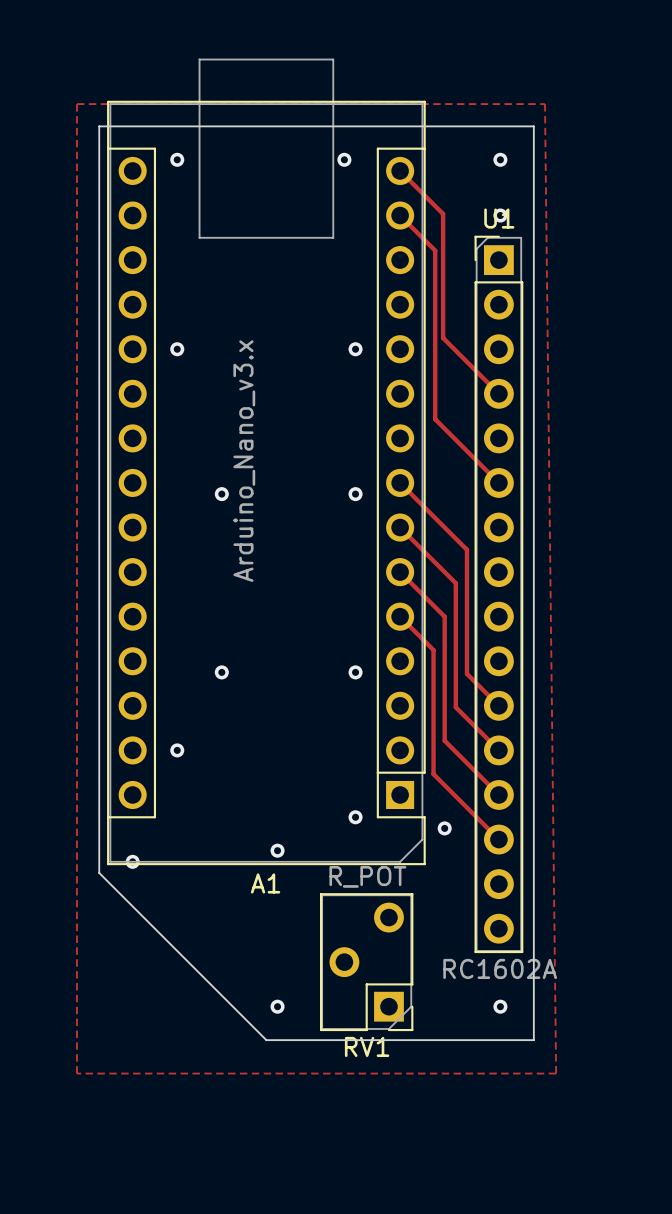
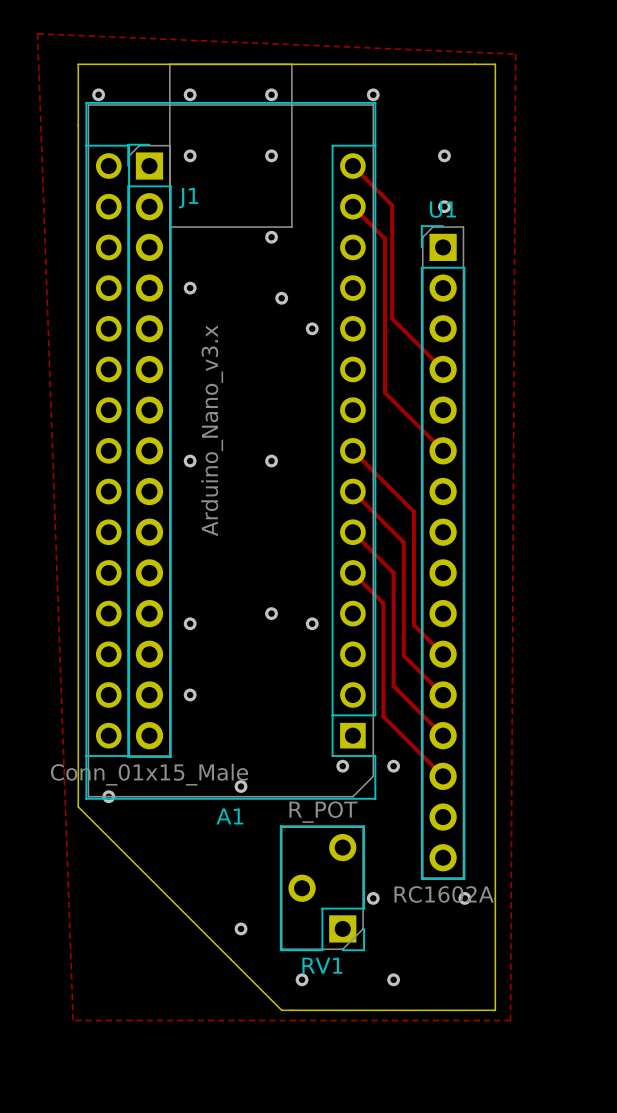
via: none -> (98, 94)
via: none -> (190, 94)
via: none -> (271, 94)
via: none -> (373, 94)
zone outline: (76, 104) (76, 1073) (556, 1073) (544, 104) (76, 104) -> (37, 33) (73, 1020) (510, 1020) (515, 54) (37, 33)
board edge: (99, 126) (533, 126) (533, 1040) (266, 1040) -> (78, 125) (78, 64) (495, 64) (495, 1010) (281, 1010) (230, 959)
via: (177, 159) -> none
via: none -> (190, 155)
via position: (344, 159) -> (271, 155)
via: none -> (271, 237)
via: none -> (190, 288)
via: none -> (281, 298)
J1: none -> Conn_01x15_Male (149, 450)
via position: (355, 494) -> (271, 461)
via: none -> (271, 613)
via: none -> (190, 694)
via position: (355, 817) -> (342, 766)
via: none -> (373, 898)
via: none -> (464, 898)
via: (500, 1006) -> none
via: none -> (302, 979)
via: none -> (393, 979)

